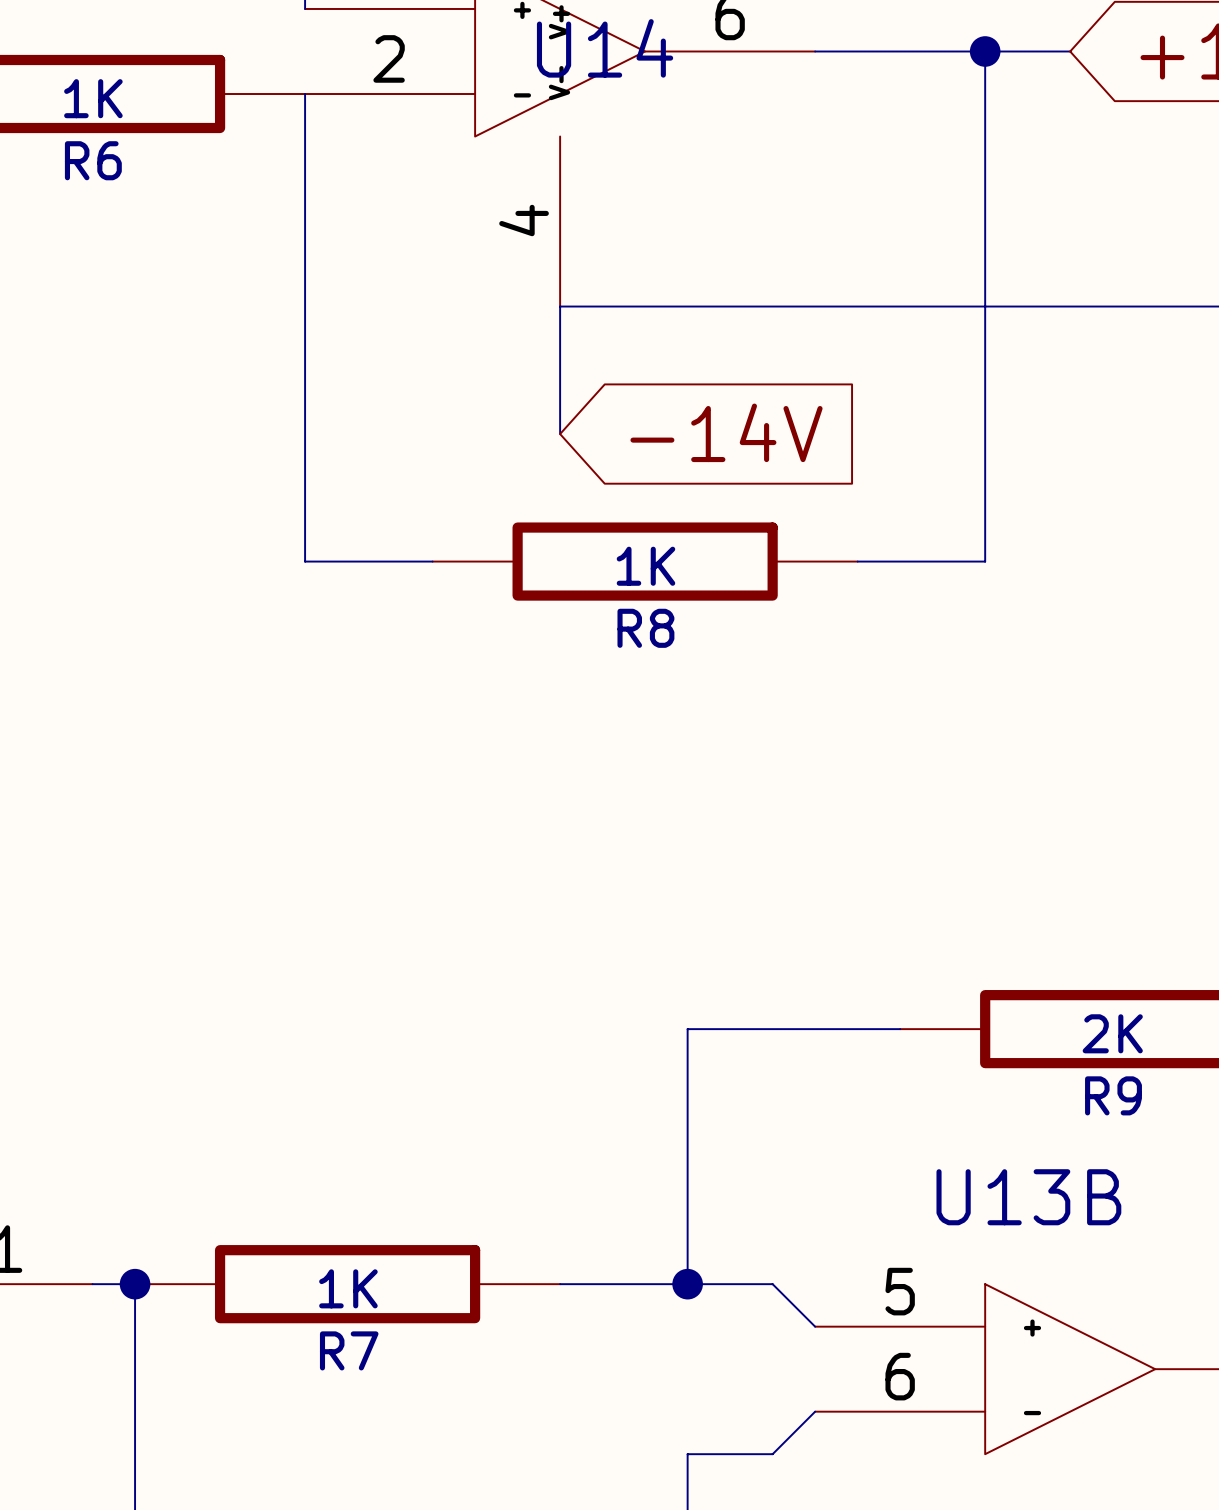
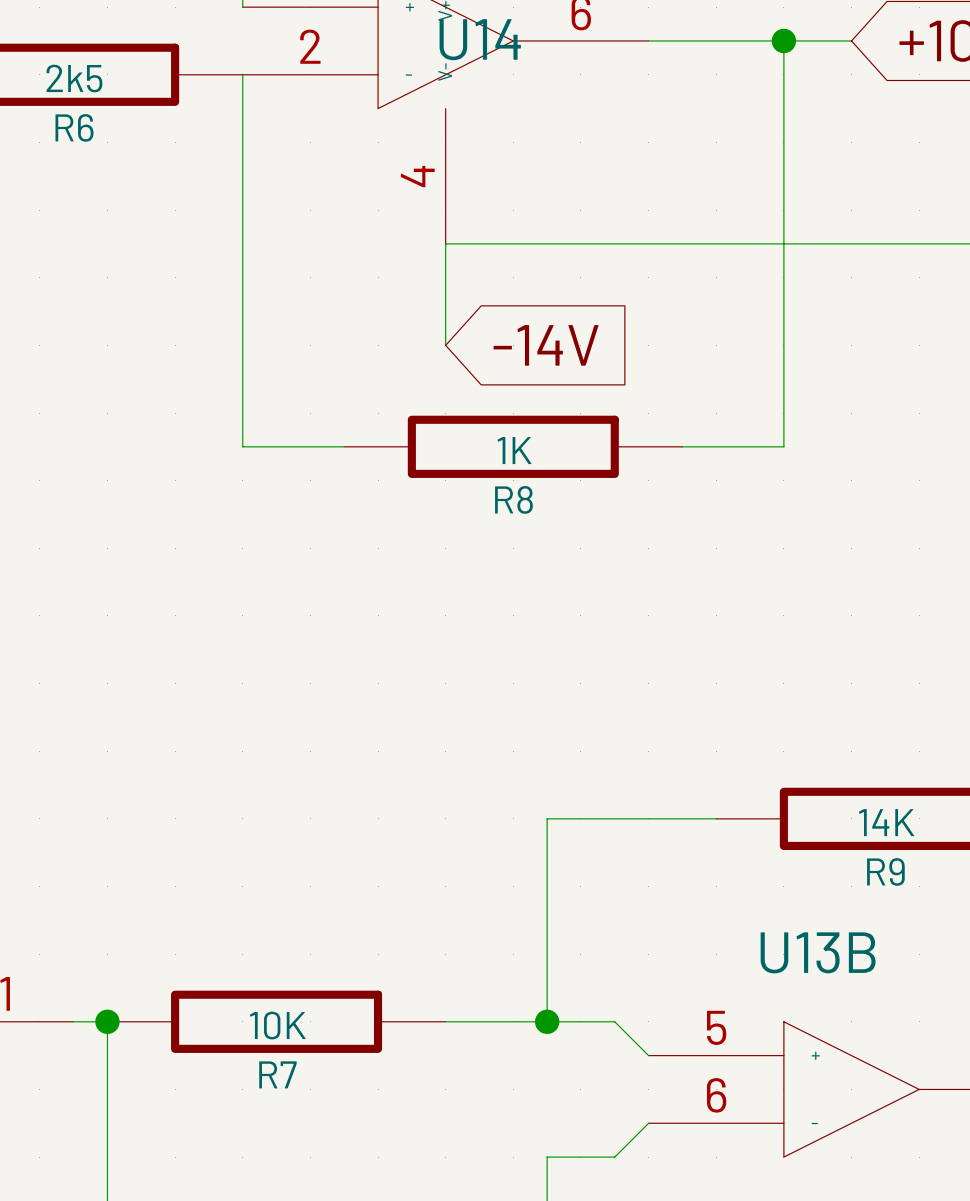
R6 value: 1K (93, 98) -> 2k5 (74, 78)
R9 value: 2K (1112, 1033) -> 14K (886, 822)
R7 value: 1K (348, 1288) -> 10K (277, 1025)

